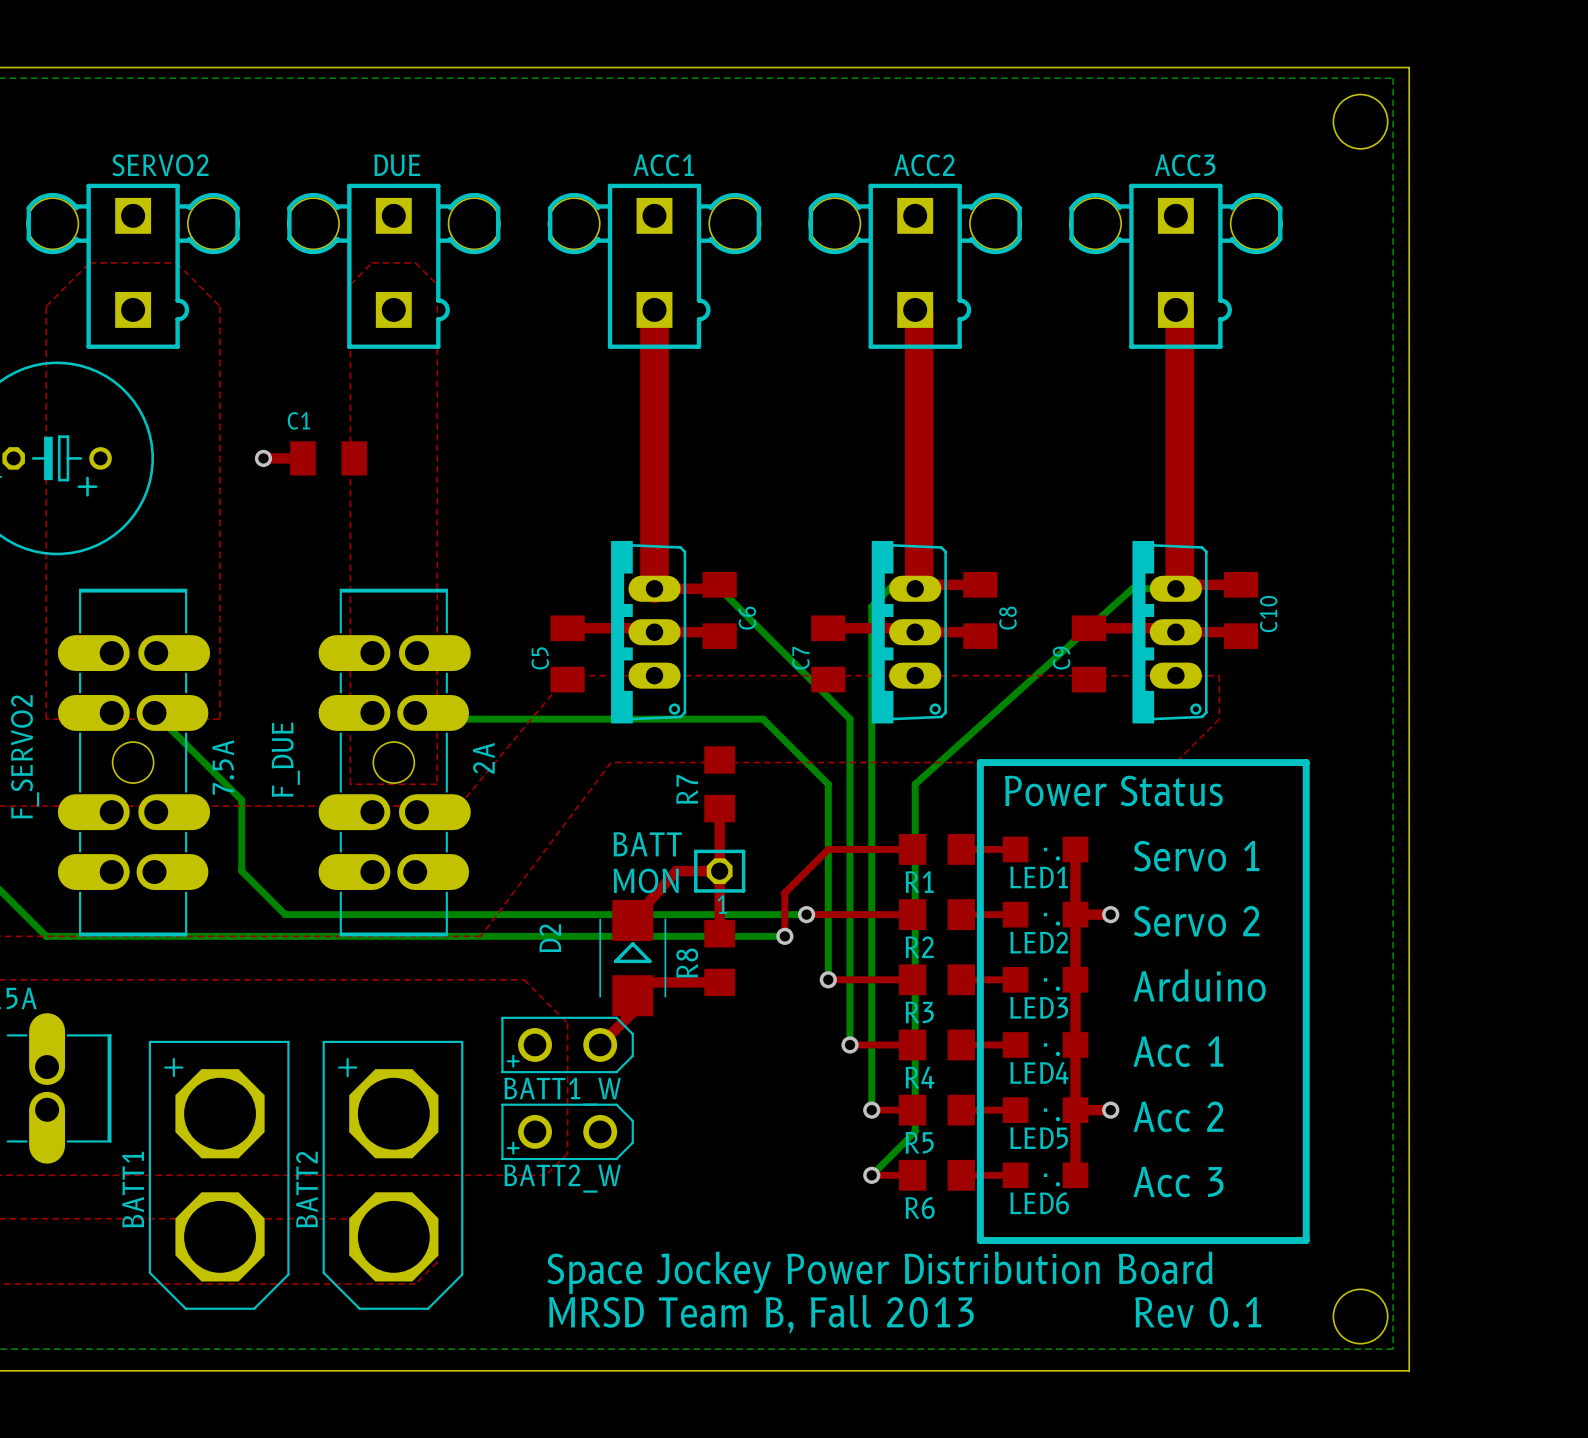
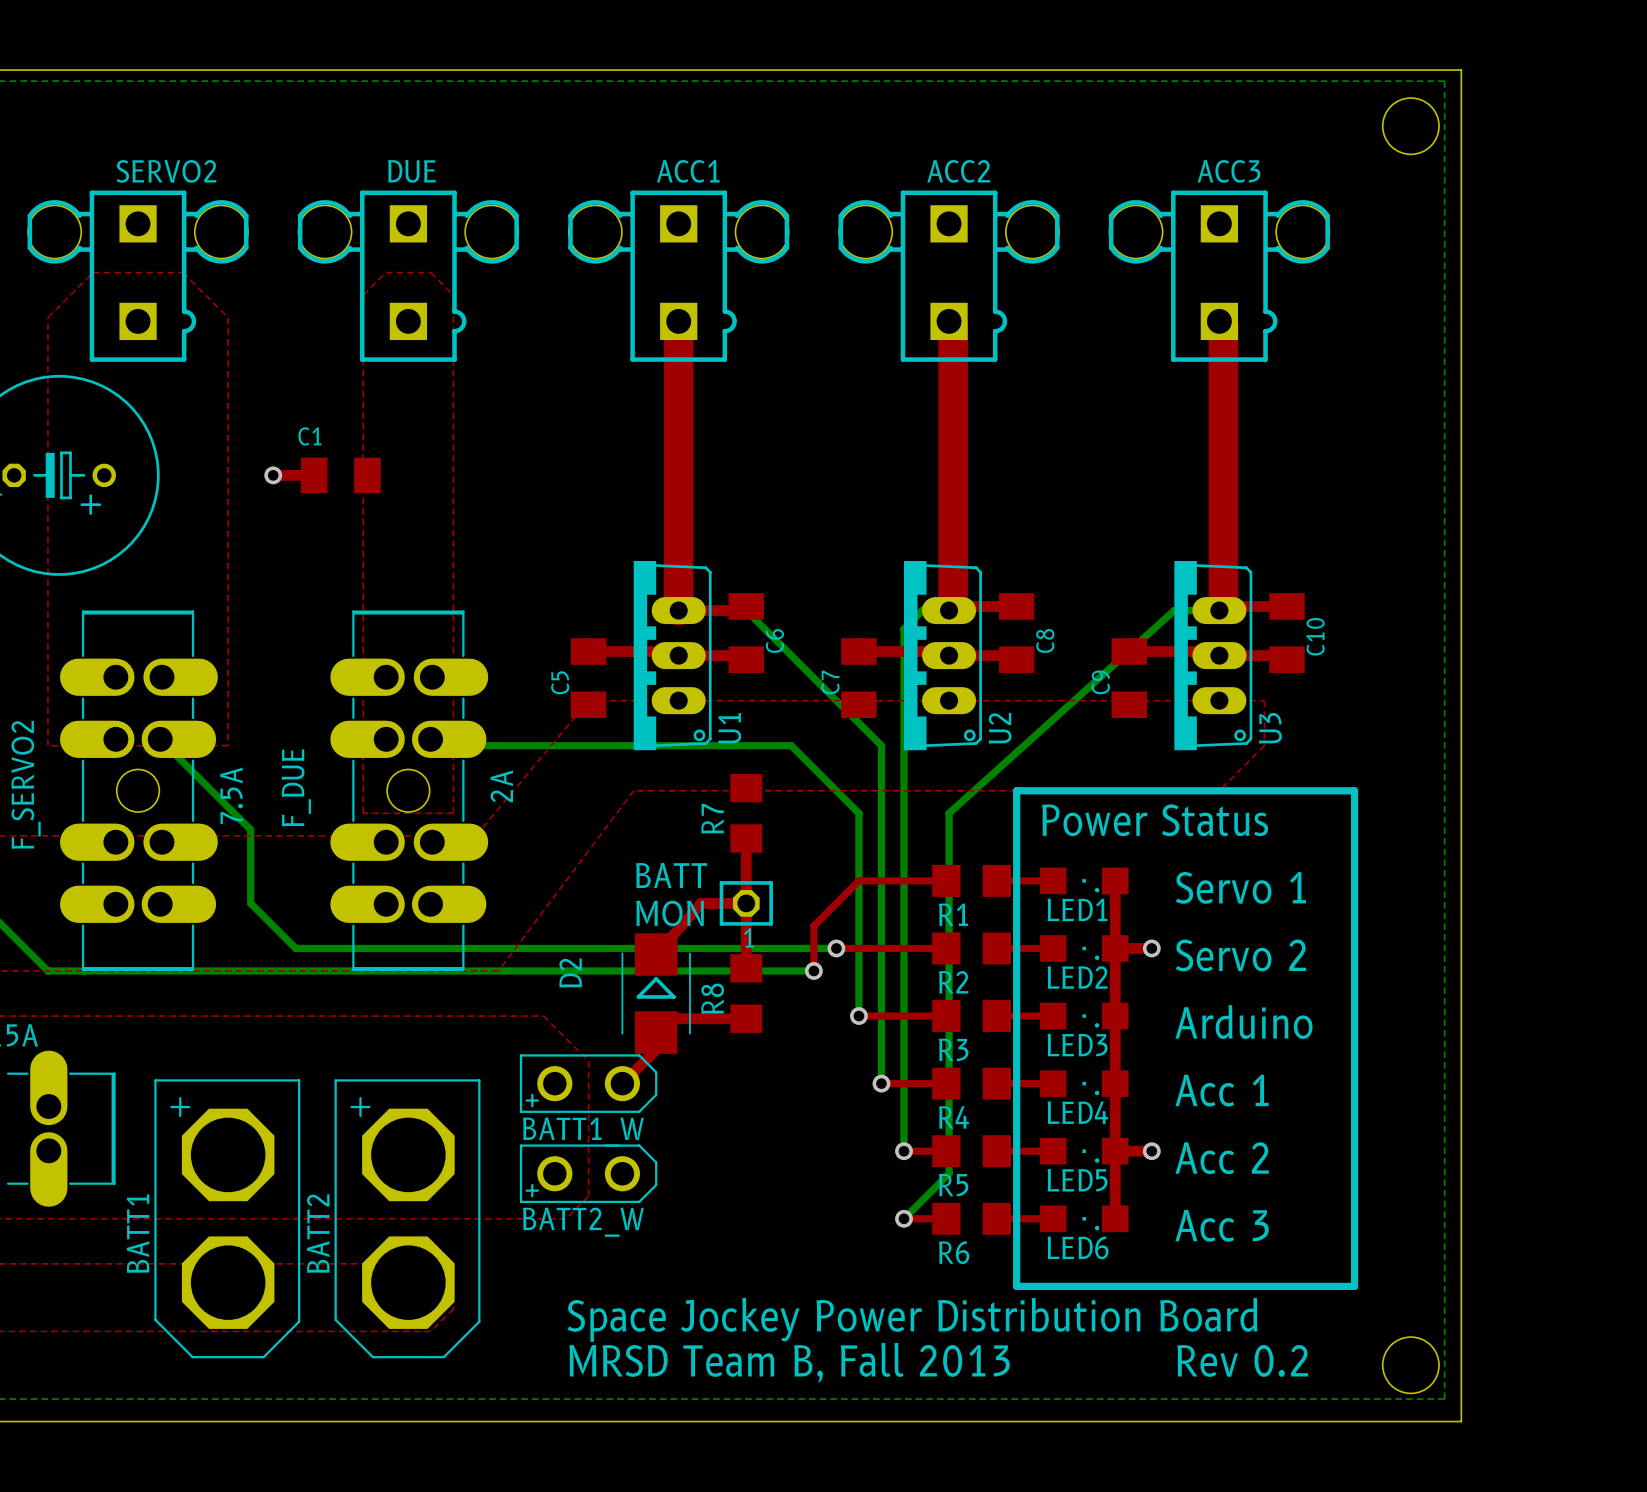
U1 name: none -> U1 (729, 728)
U2 name: none -> U2 (1000, 728)
U3 name: none -> U3 (1270, 728)
text: Rev 0.1 (1198, 1312) -> Rev 0.2 (1242, 1360)

